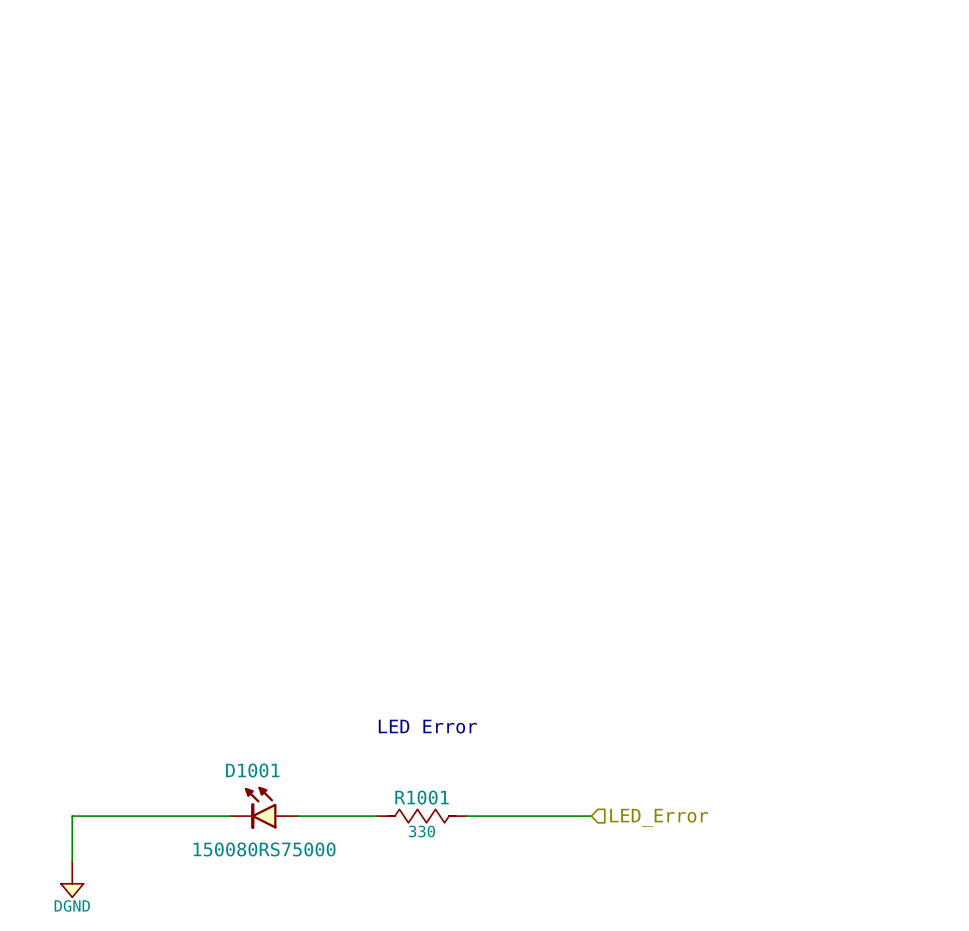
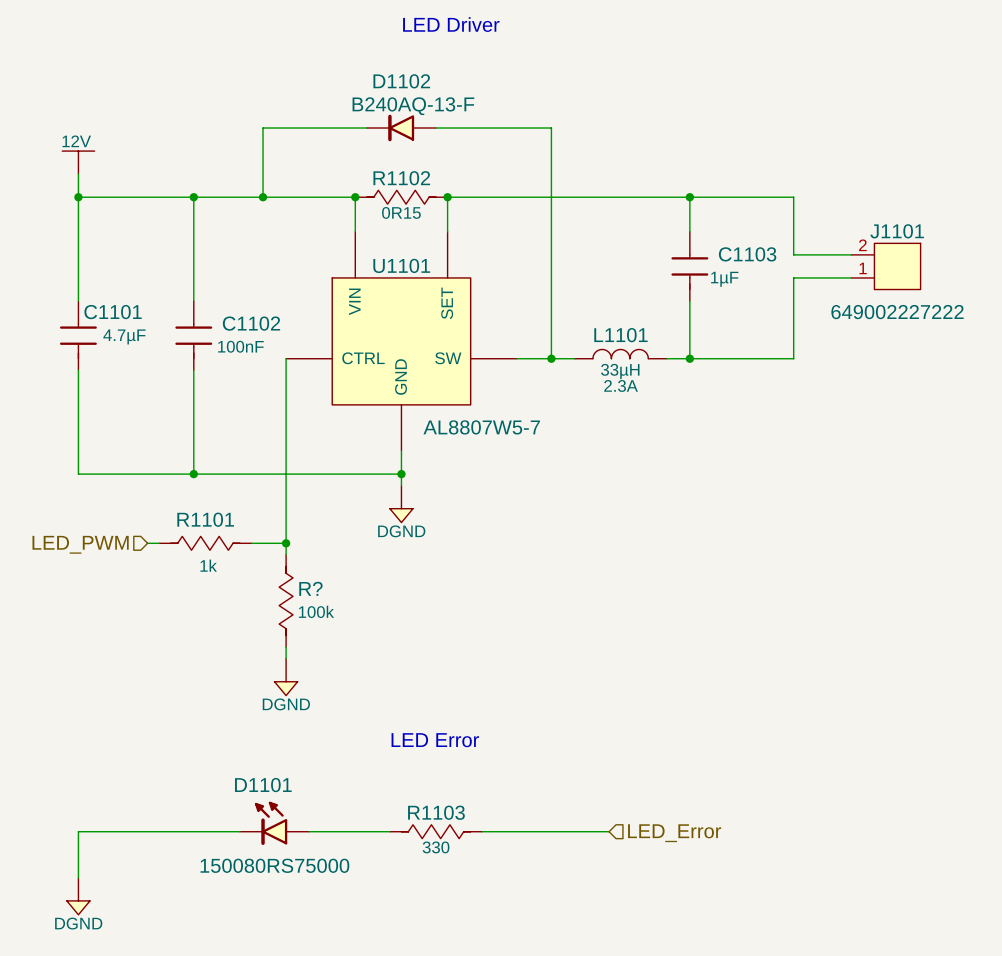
text: none -> LED Driver (451, 24)
wire: none -> (366, 128) (263, 128) (263, 197)
D1102: none -> B240AQ-13-F (401, 128)
wire: none -> (436, 128) (551, 128) (551, 358)
power symbol: none -> 12V (78, 162)
wire: none -> (78, 174) (78, 301)
wire: none -> (78, 197) (355, 197) (355, 231)
junction: none -> (78, 197)
wire: none -> (193, 197) (193, 301)
junction: none -> (193, 197)
junction: none -> (263, 197)
junction: none -> (355, 197)
R1102: none -> (401, 197)
junction: none -> (447, 197)
wire: none -> (689, 197) (689, 231)
junction: none -> (689, 197)
wire: none -> (447, 231) (447, 197) (793, 197) (793, 254) (851, 254)
C1103: none -> (689, 266)
J1101: none -> 649002227222 (885, 266)
wire: none -> (851, 277) (793, 277) (793, 358) (666, 358)
wire: none -> (689, 301) (689, 358)
C1101: none -> (78, 335)
C1102: none -> (193, 335)
U1101: none -> AL8807W5-7 (401, 341)
L1101: none -> (620, 354)
wire: none -> (286, 358) (286, 554)
wire: none -> (516, 358) (574, 358)
junction: none -> (551, 358)
junction: none -> (689, 358)
wire: none -> (78, 370) (78, 474) (401, 474)
wire: none -> (193, 370) (193, 474)
wire: none -> (401, 451) (401, 485)
junction: none -> (193, 474)
junction: none -> (401, 474)
power symbol: none -> DGND (401, 504)
wire: none -> (147, 543) (159, 543)
R1101: none -> (205, 543)
wire: none -> (251, 543) (286, 543)
junction: none -> (286, 543)
hierarchical label: none -> LED_PWM (80, 544)
R?: none -> (286, 600)
wire: none -> (286, 647) (286, 658)
power symbol: none -> DGND (286, 677)
D1001 name: D1001 (252, 770) -> D1101 (263, 785)
R1001 name: R1001 (422, 797) -> R1103 (436, 812)

